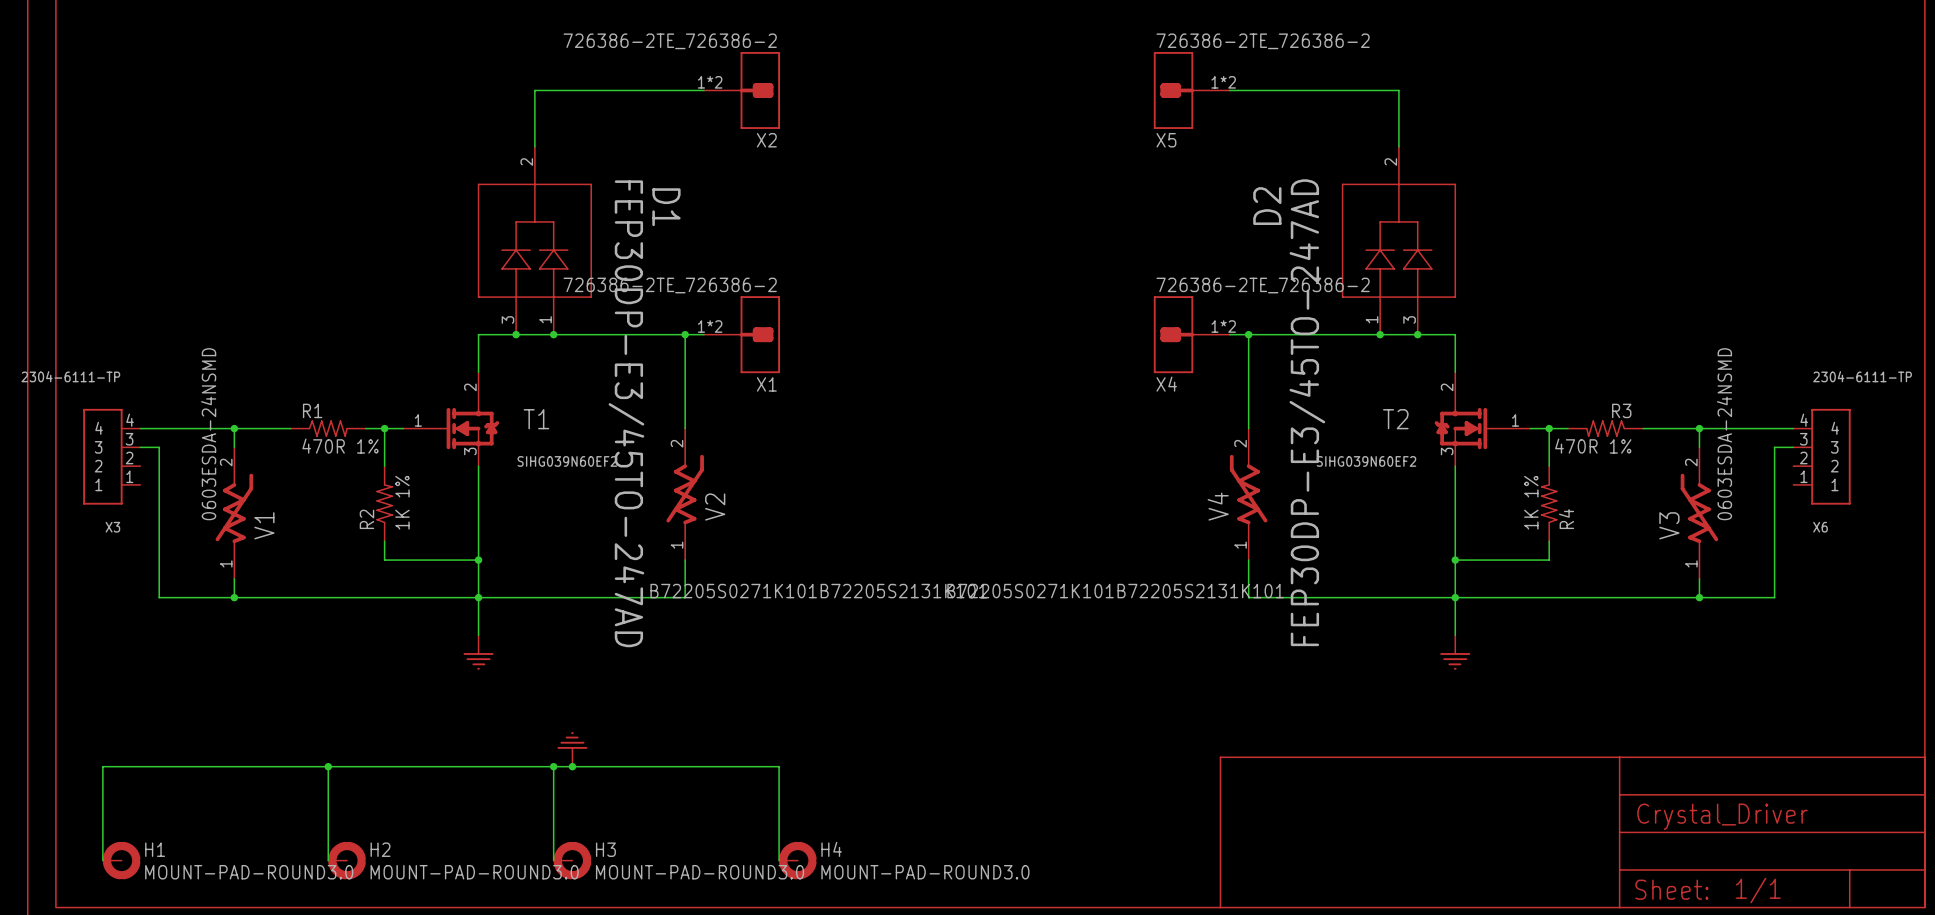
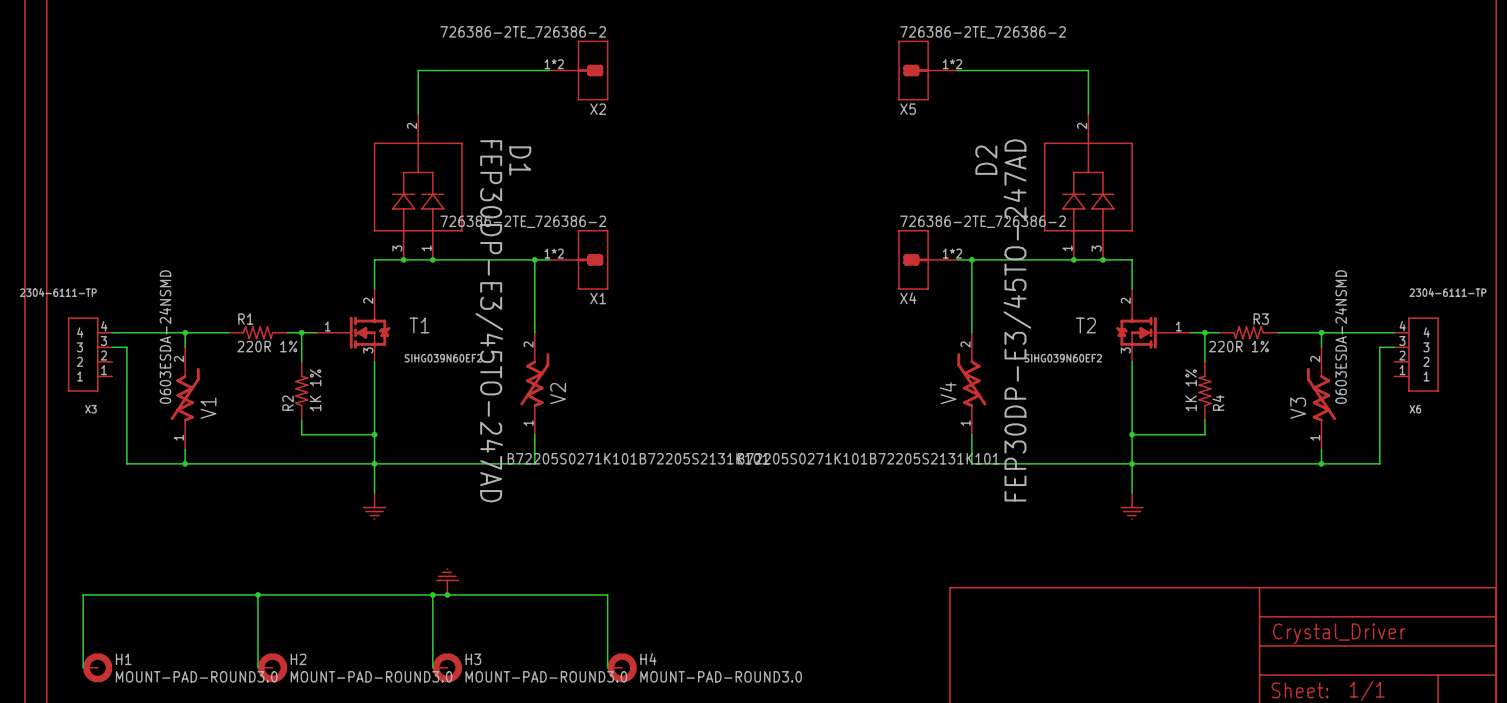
R1 value: 470R 1% (340, 446) -> 220R 1% (267, 346)
R3 value: 470R 1% (1593, 446) -> 220R 1% (1238, 346)

